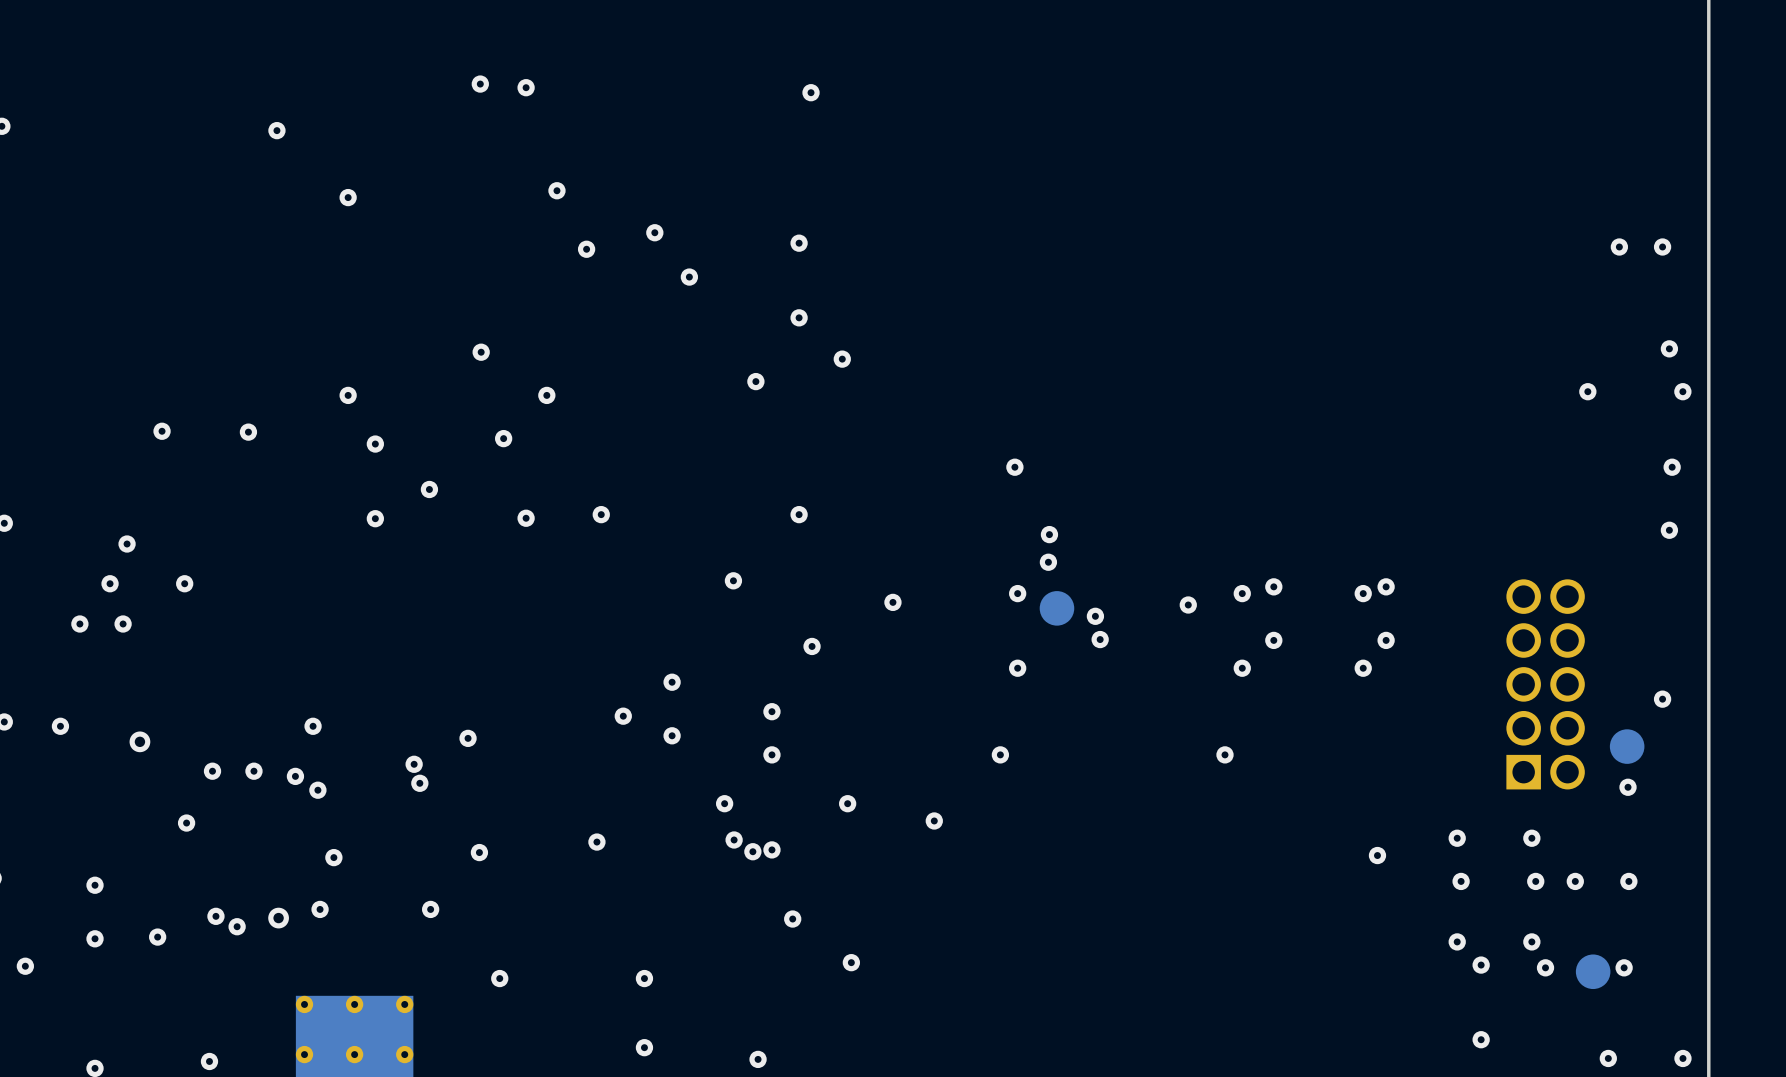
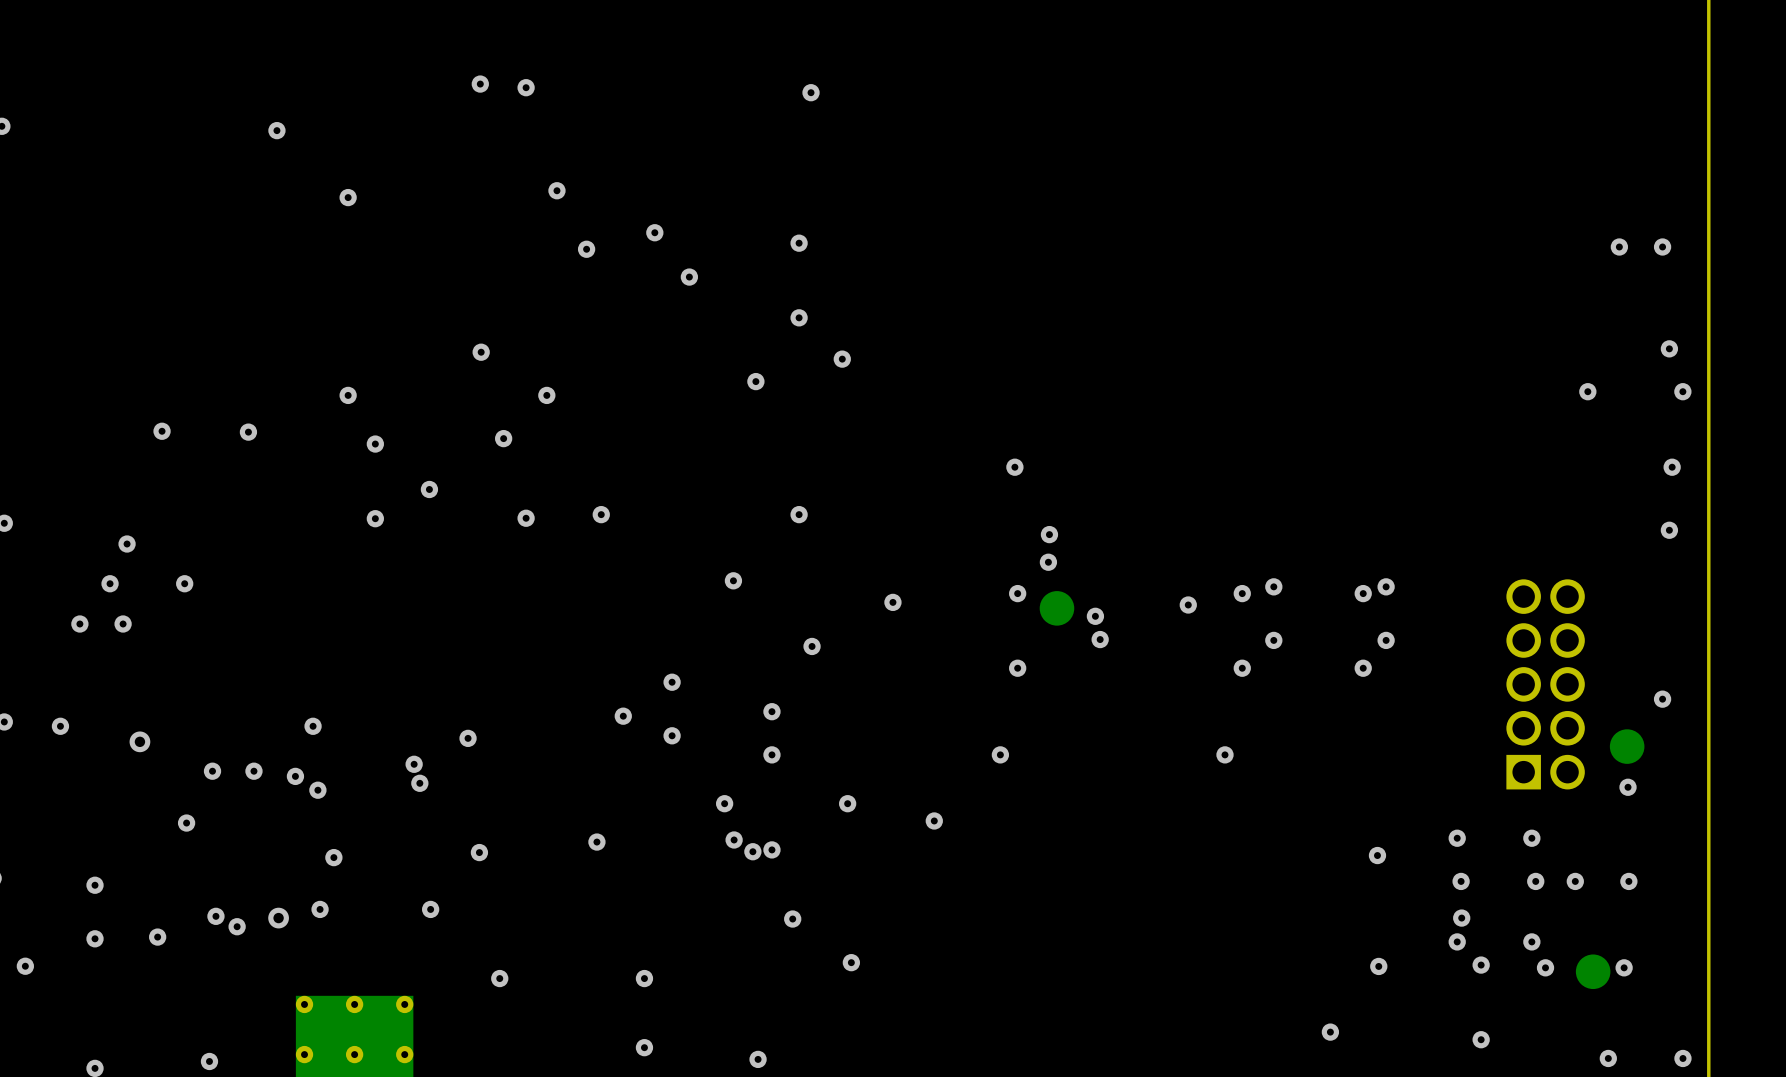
via: none -> (1461, 918)
via: none -> (1378, 966)
via: none -> (1330, 1032)

